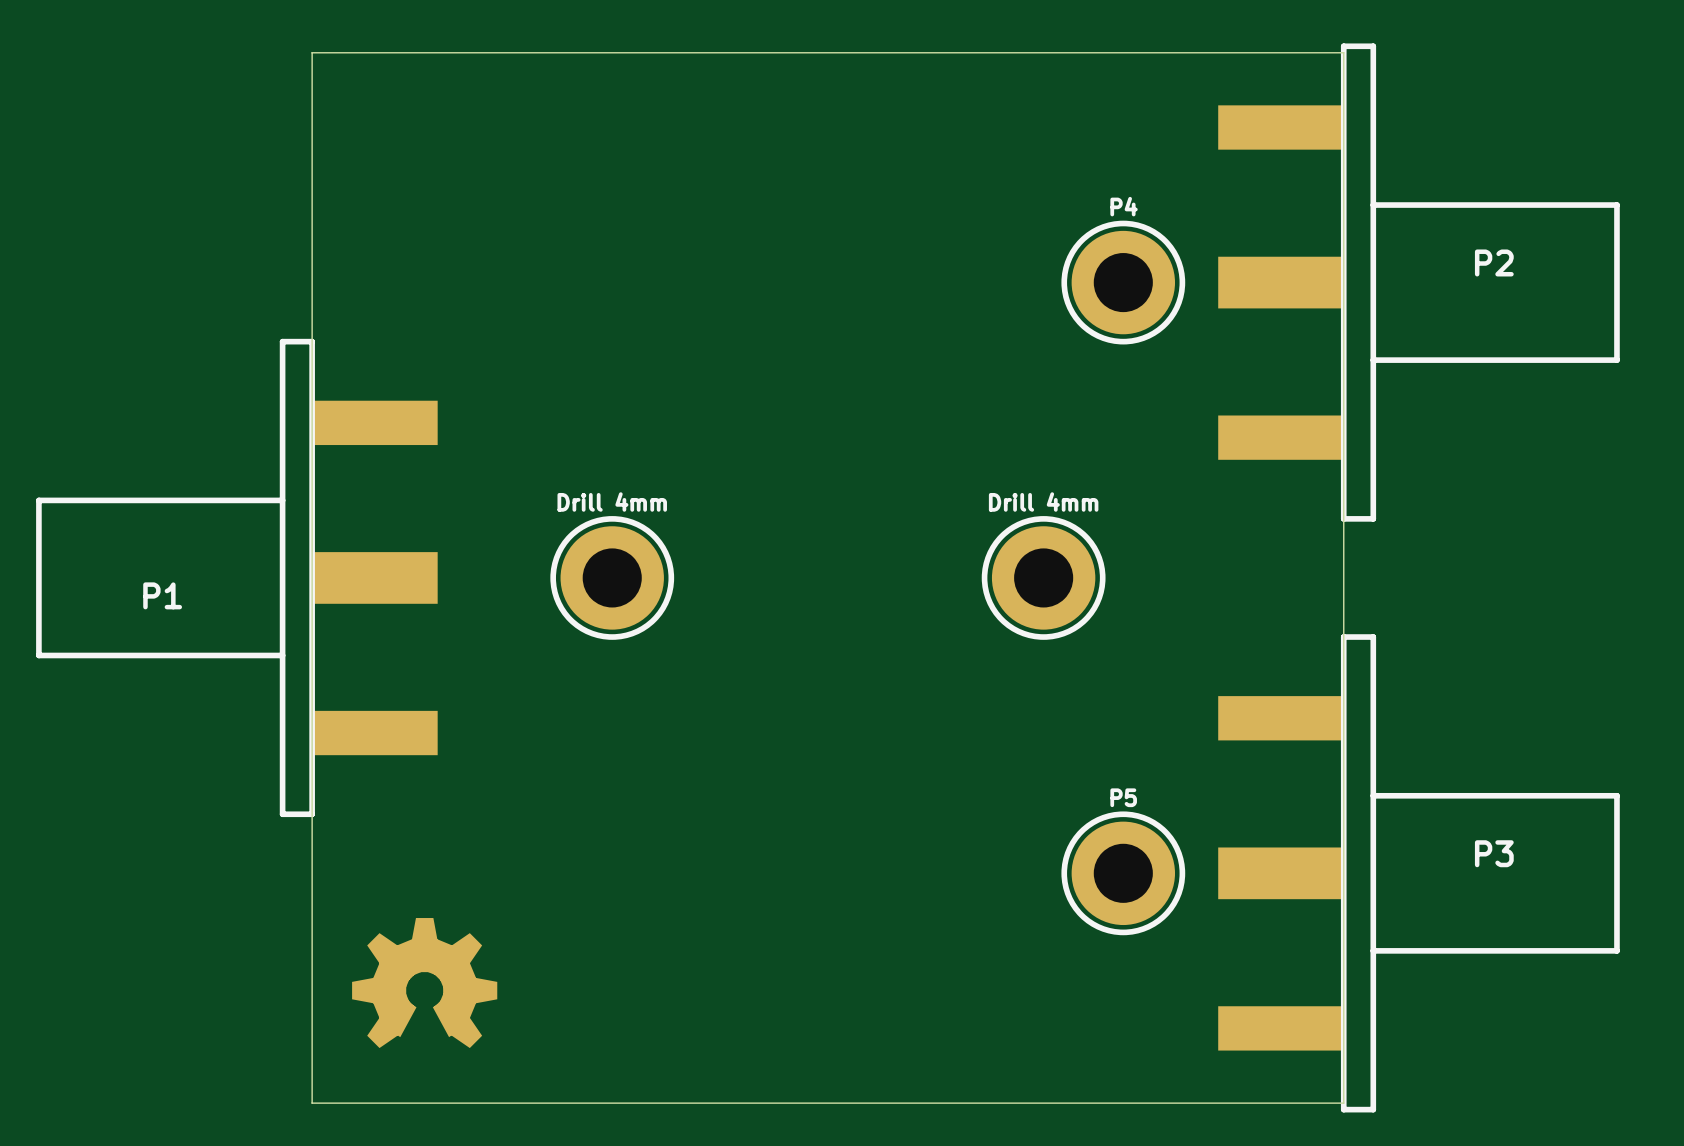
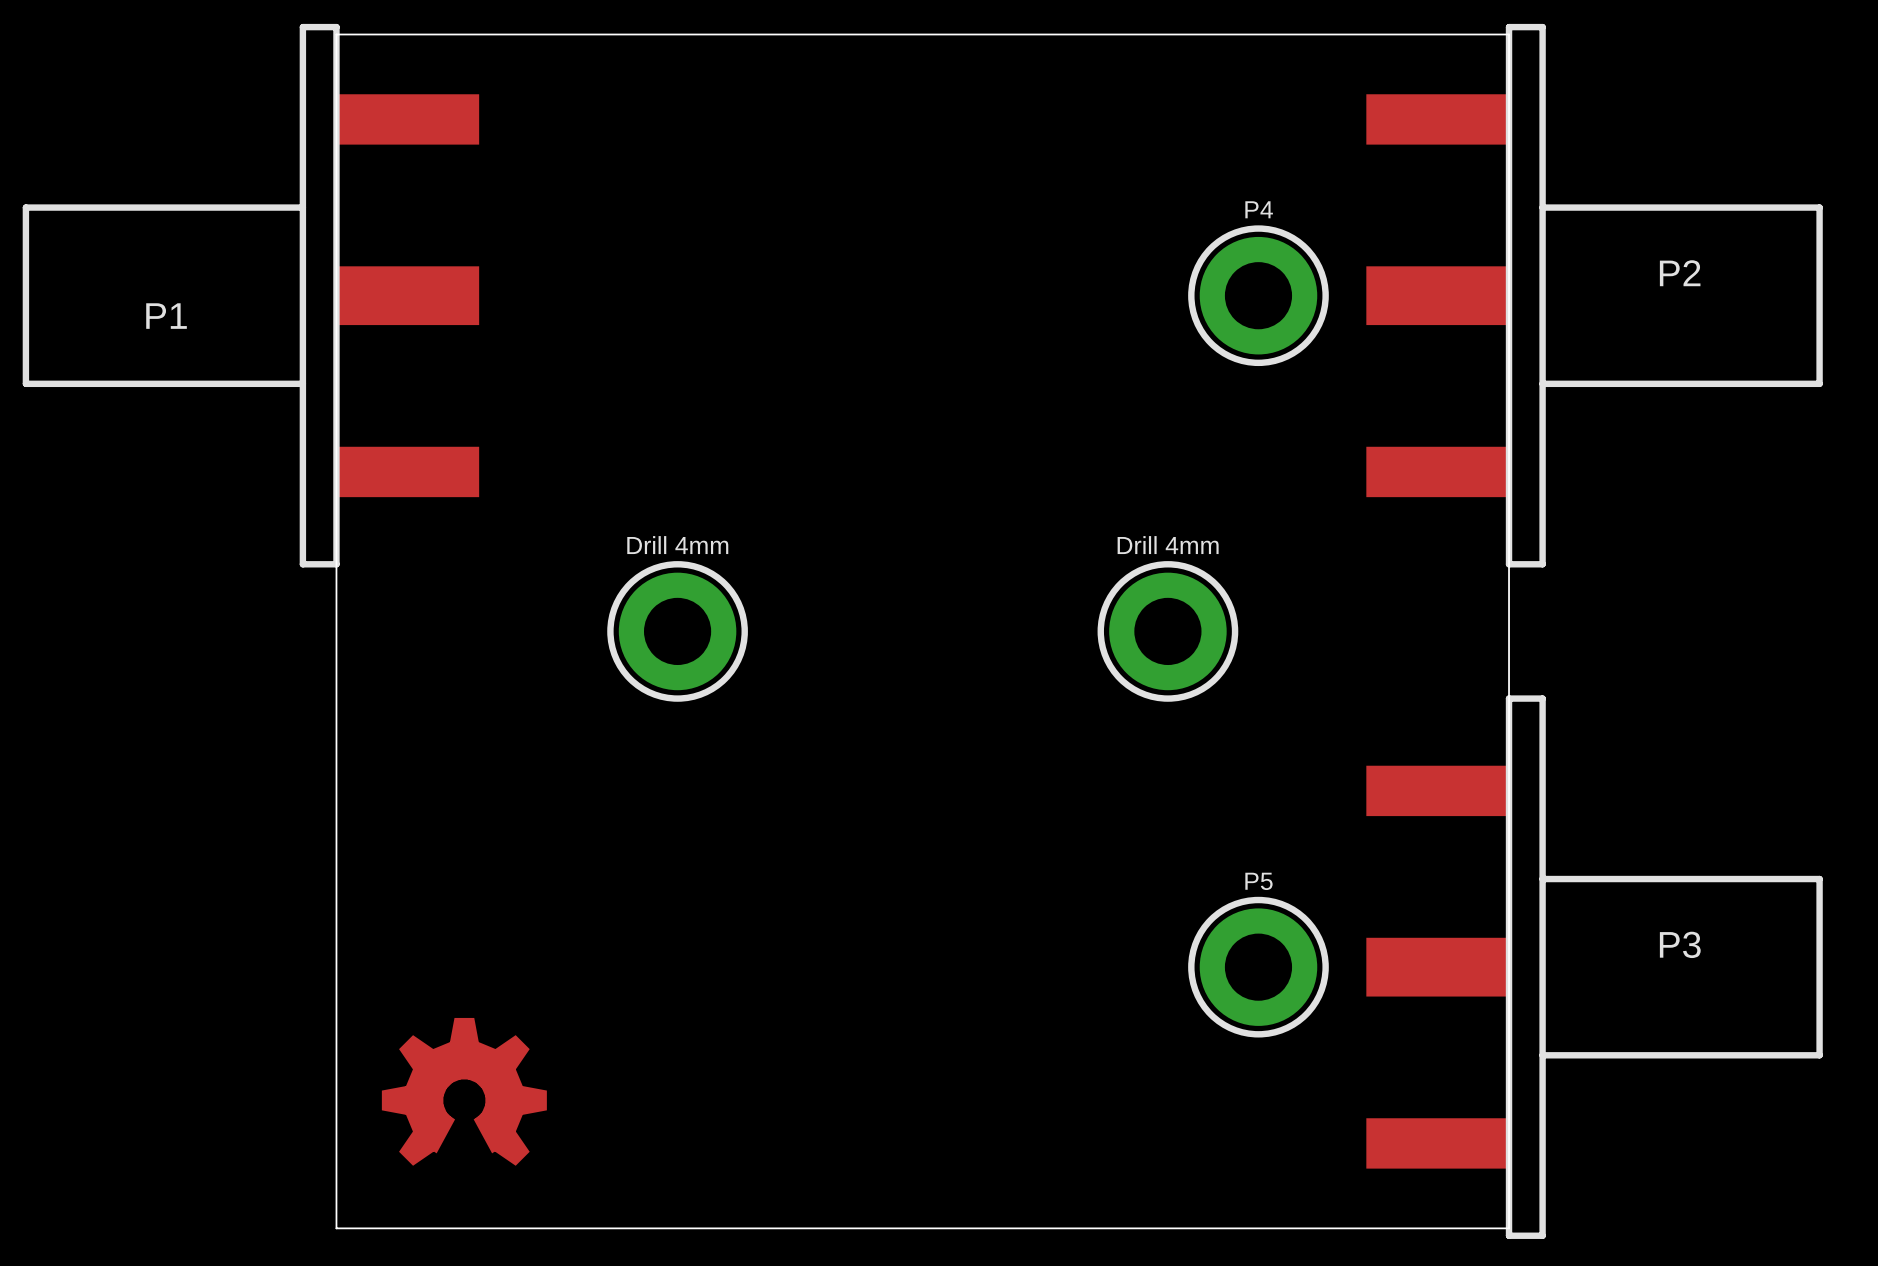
P1 position: (236, 577) -> (250, 295)

